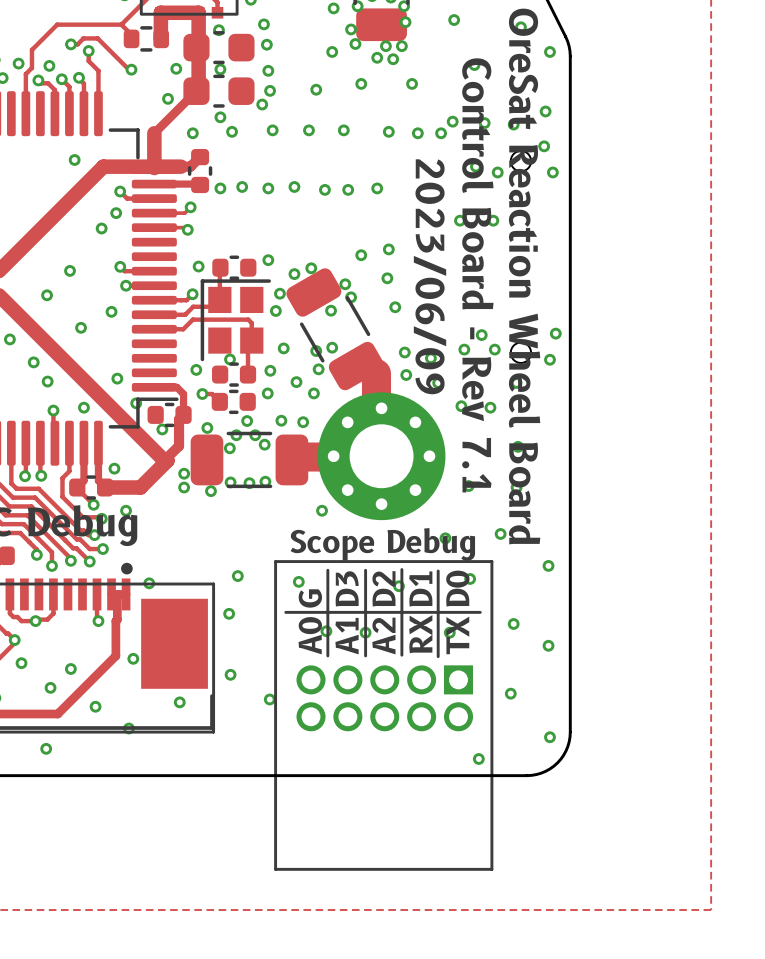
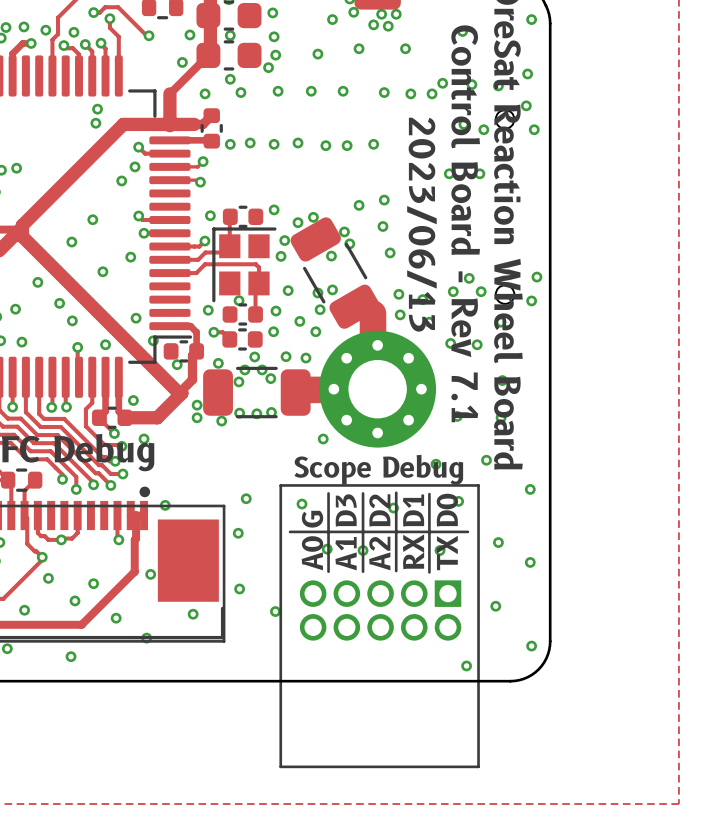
via: none -> (97, 109)
via: (74, 159) -> none
via: none -> (95, 123)
text: 2023/06/09 (430, 276) -> 2023/06/13 (421, 224)

